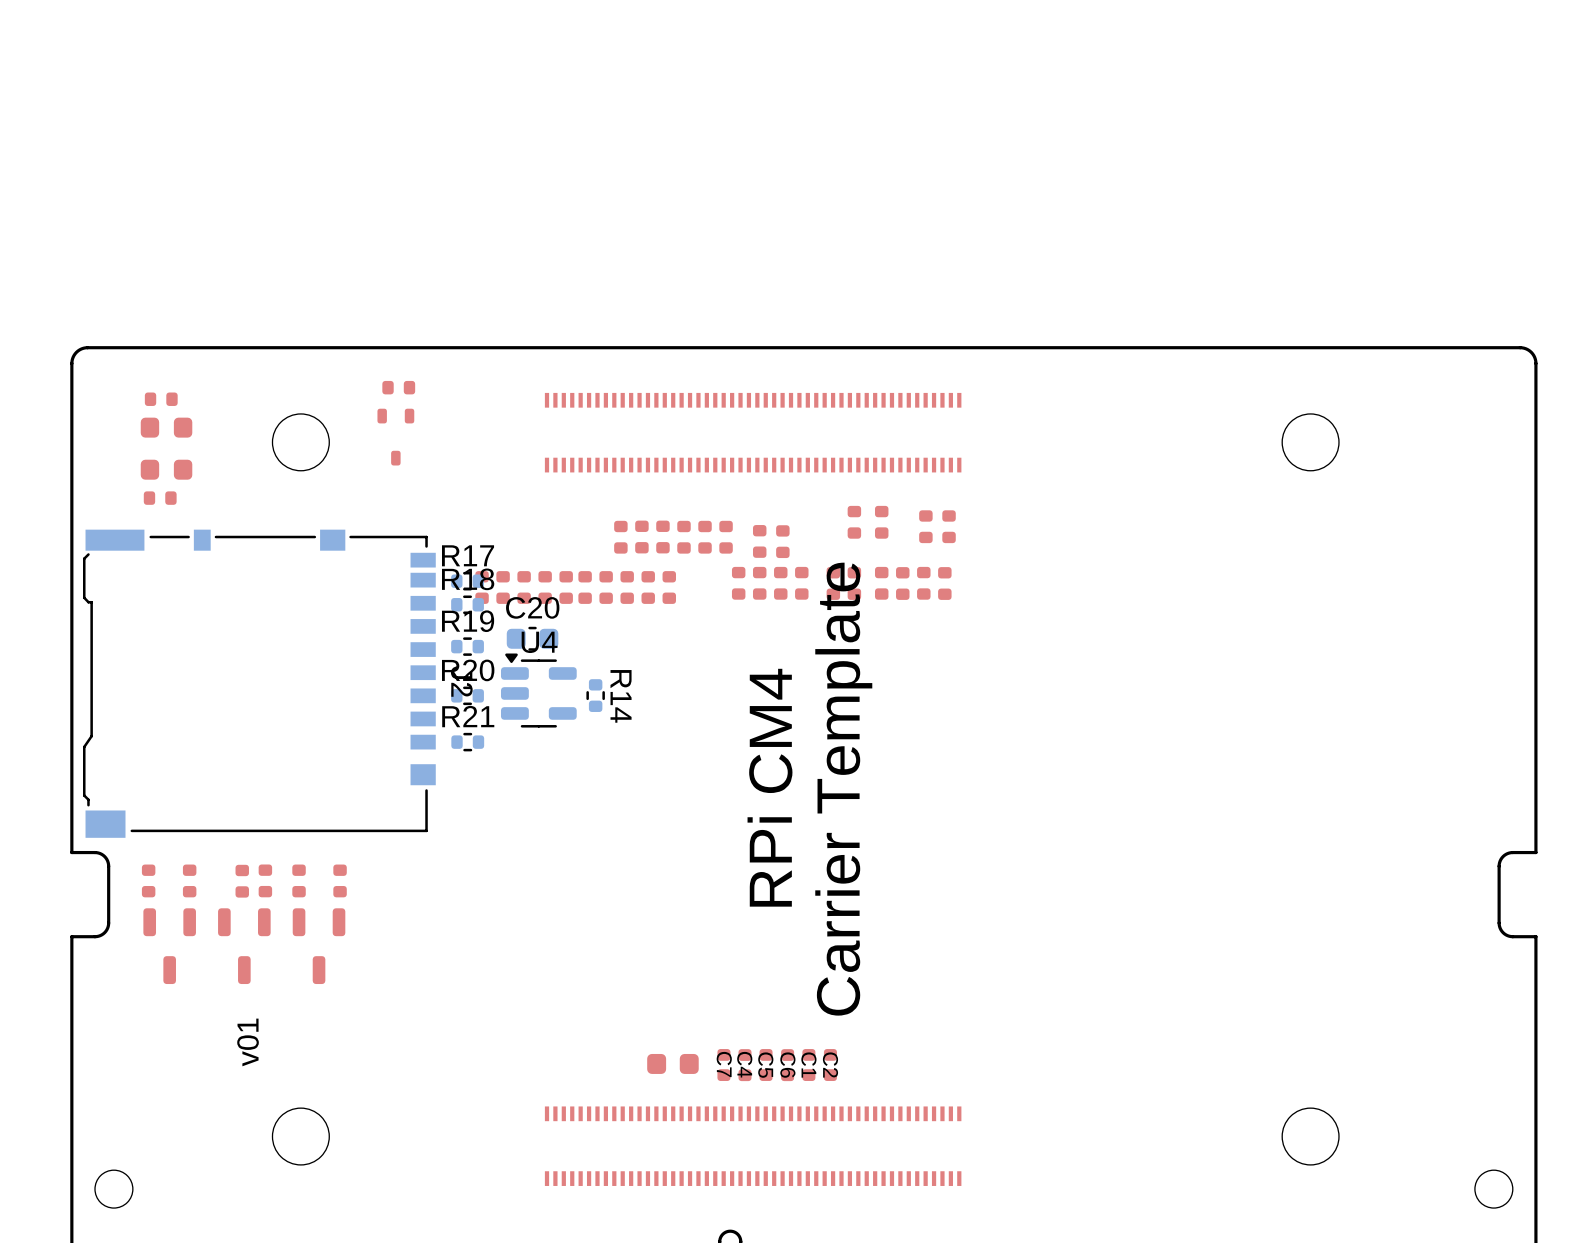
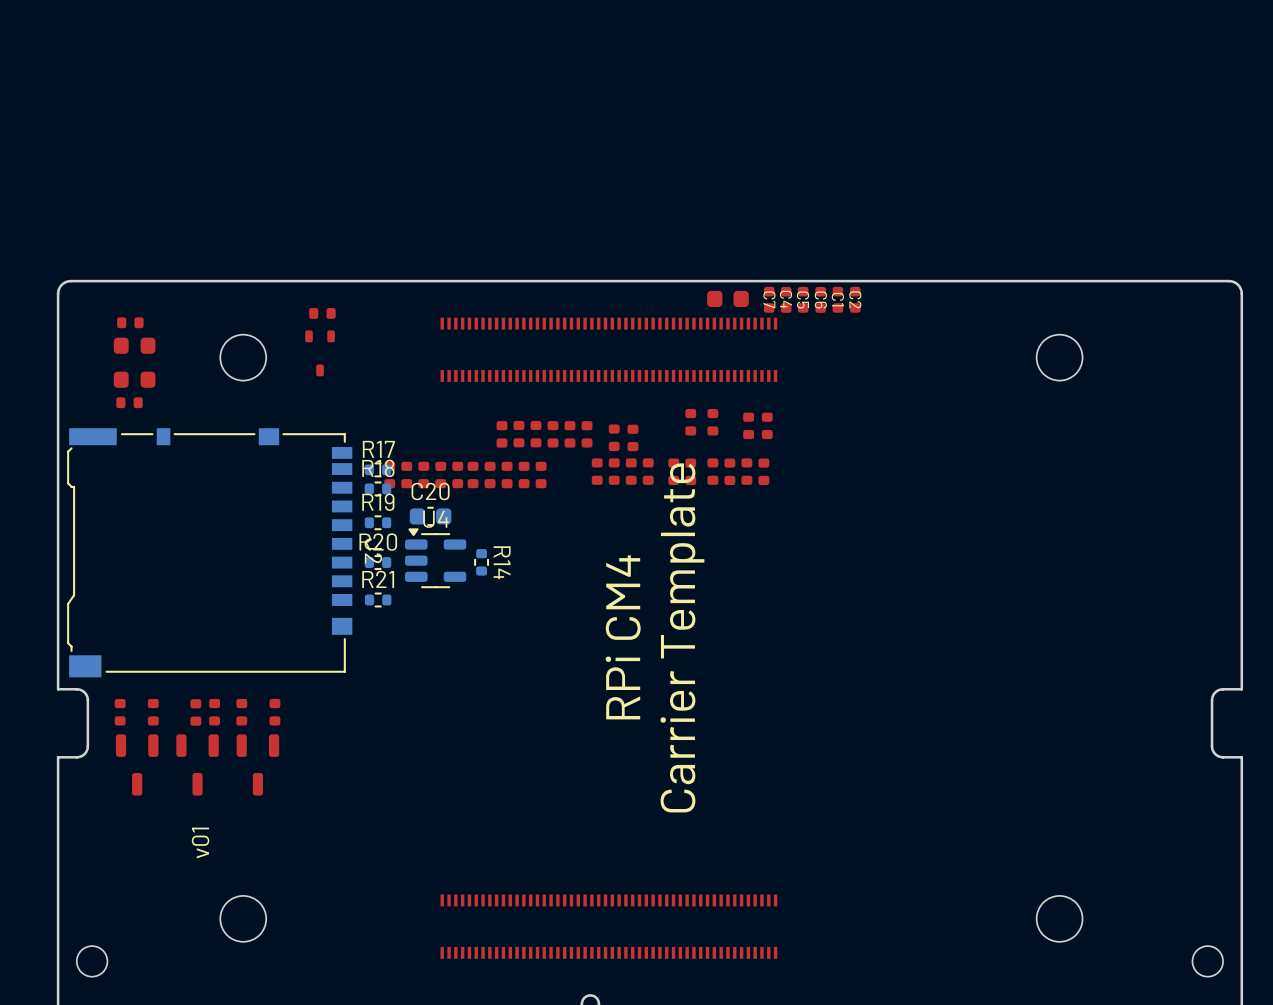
part: none -> (727, 298)
part: (672, 1063) -> none
C7 position: (723, 1065) -> (769, 299)
C4 position: (744, 1065) -> (786, 299)
C5 position: (766, 1065) -> (803, 299)
C6 position: (787, 1065) -> (820, 299)
C2 position: (808, 1065) -> (837, 299)
C1 position: (830, 1065) -> (855, 299)

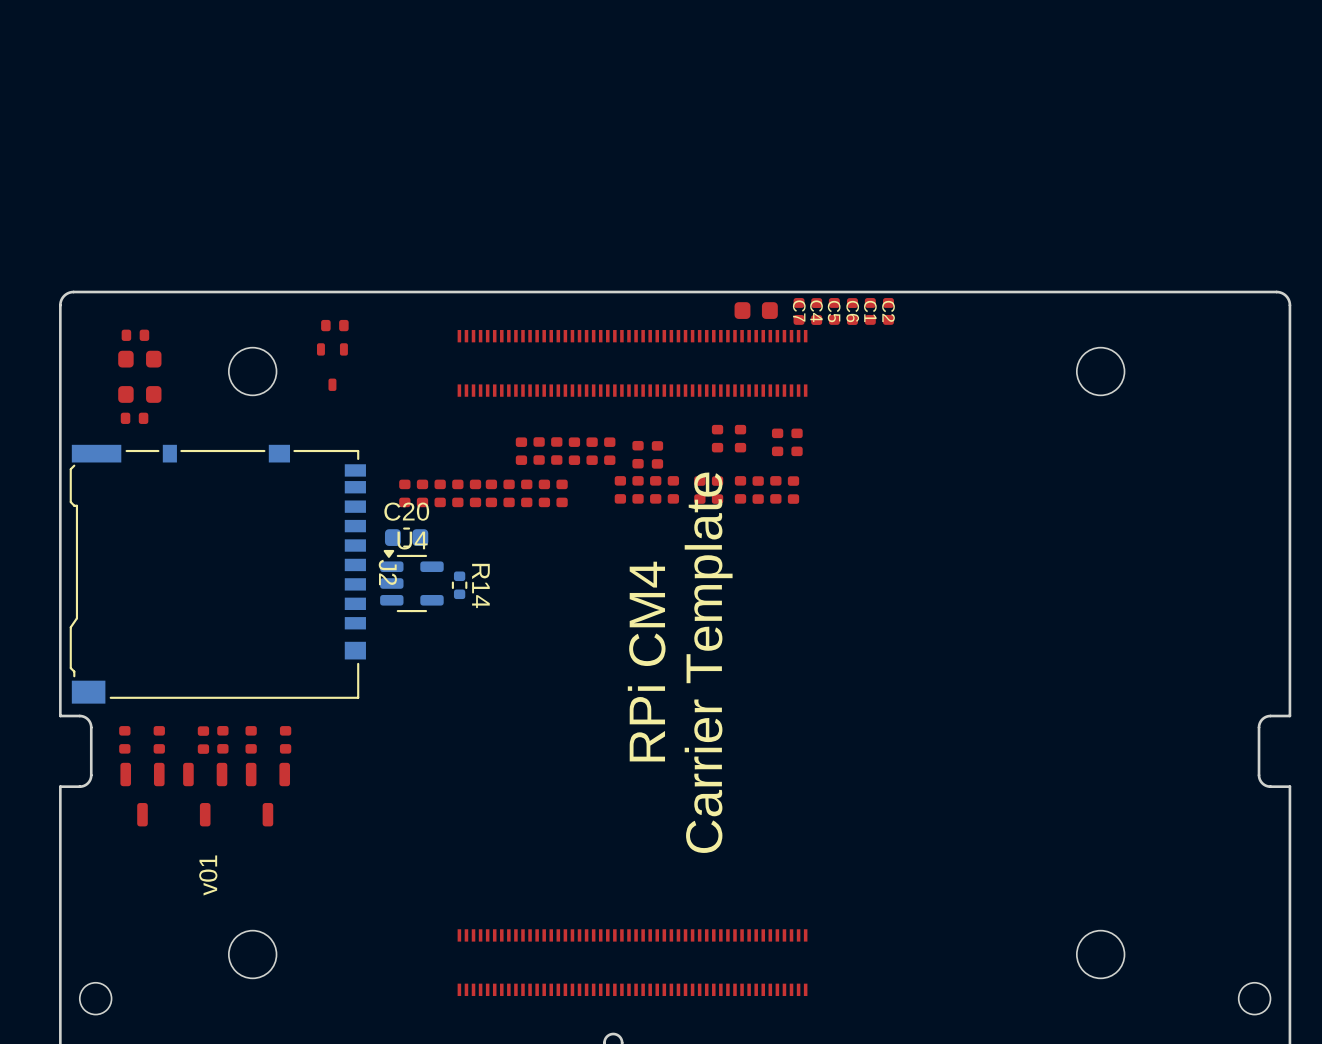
R17: (377, 469) -> none
R18: (377, 488) -> none
C20 position: (430, 516) -> (406, 537)
R19: (377, 522) -> none
U4 position: (435, 558) -> (411, 581)
R20: (377, 562) -> none
R14 position: (481, 562) -> (459, 585)
R21: (378, 599) -> none

